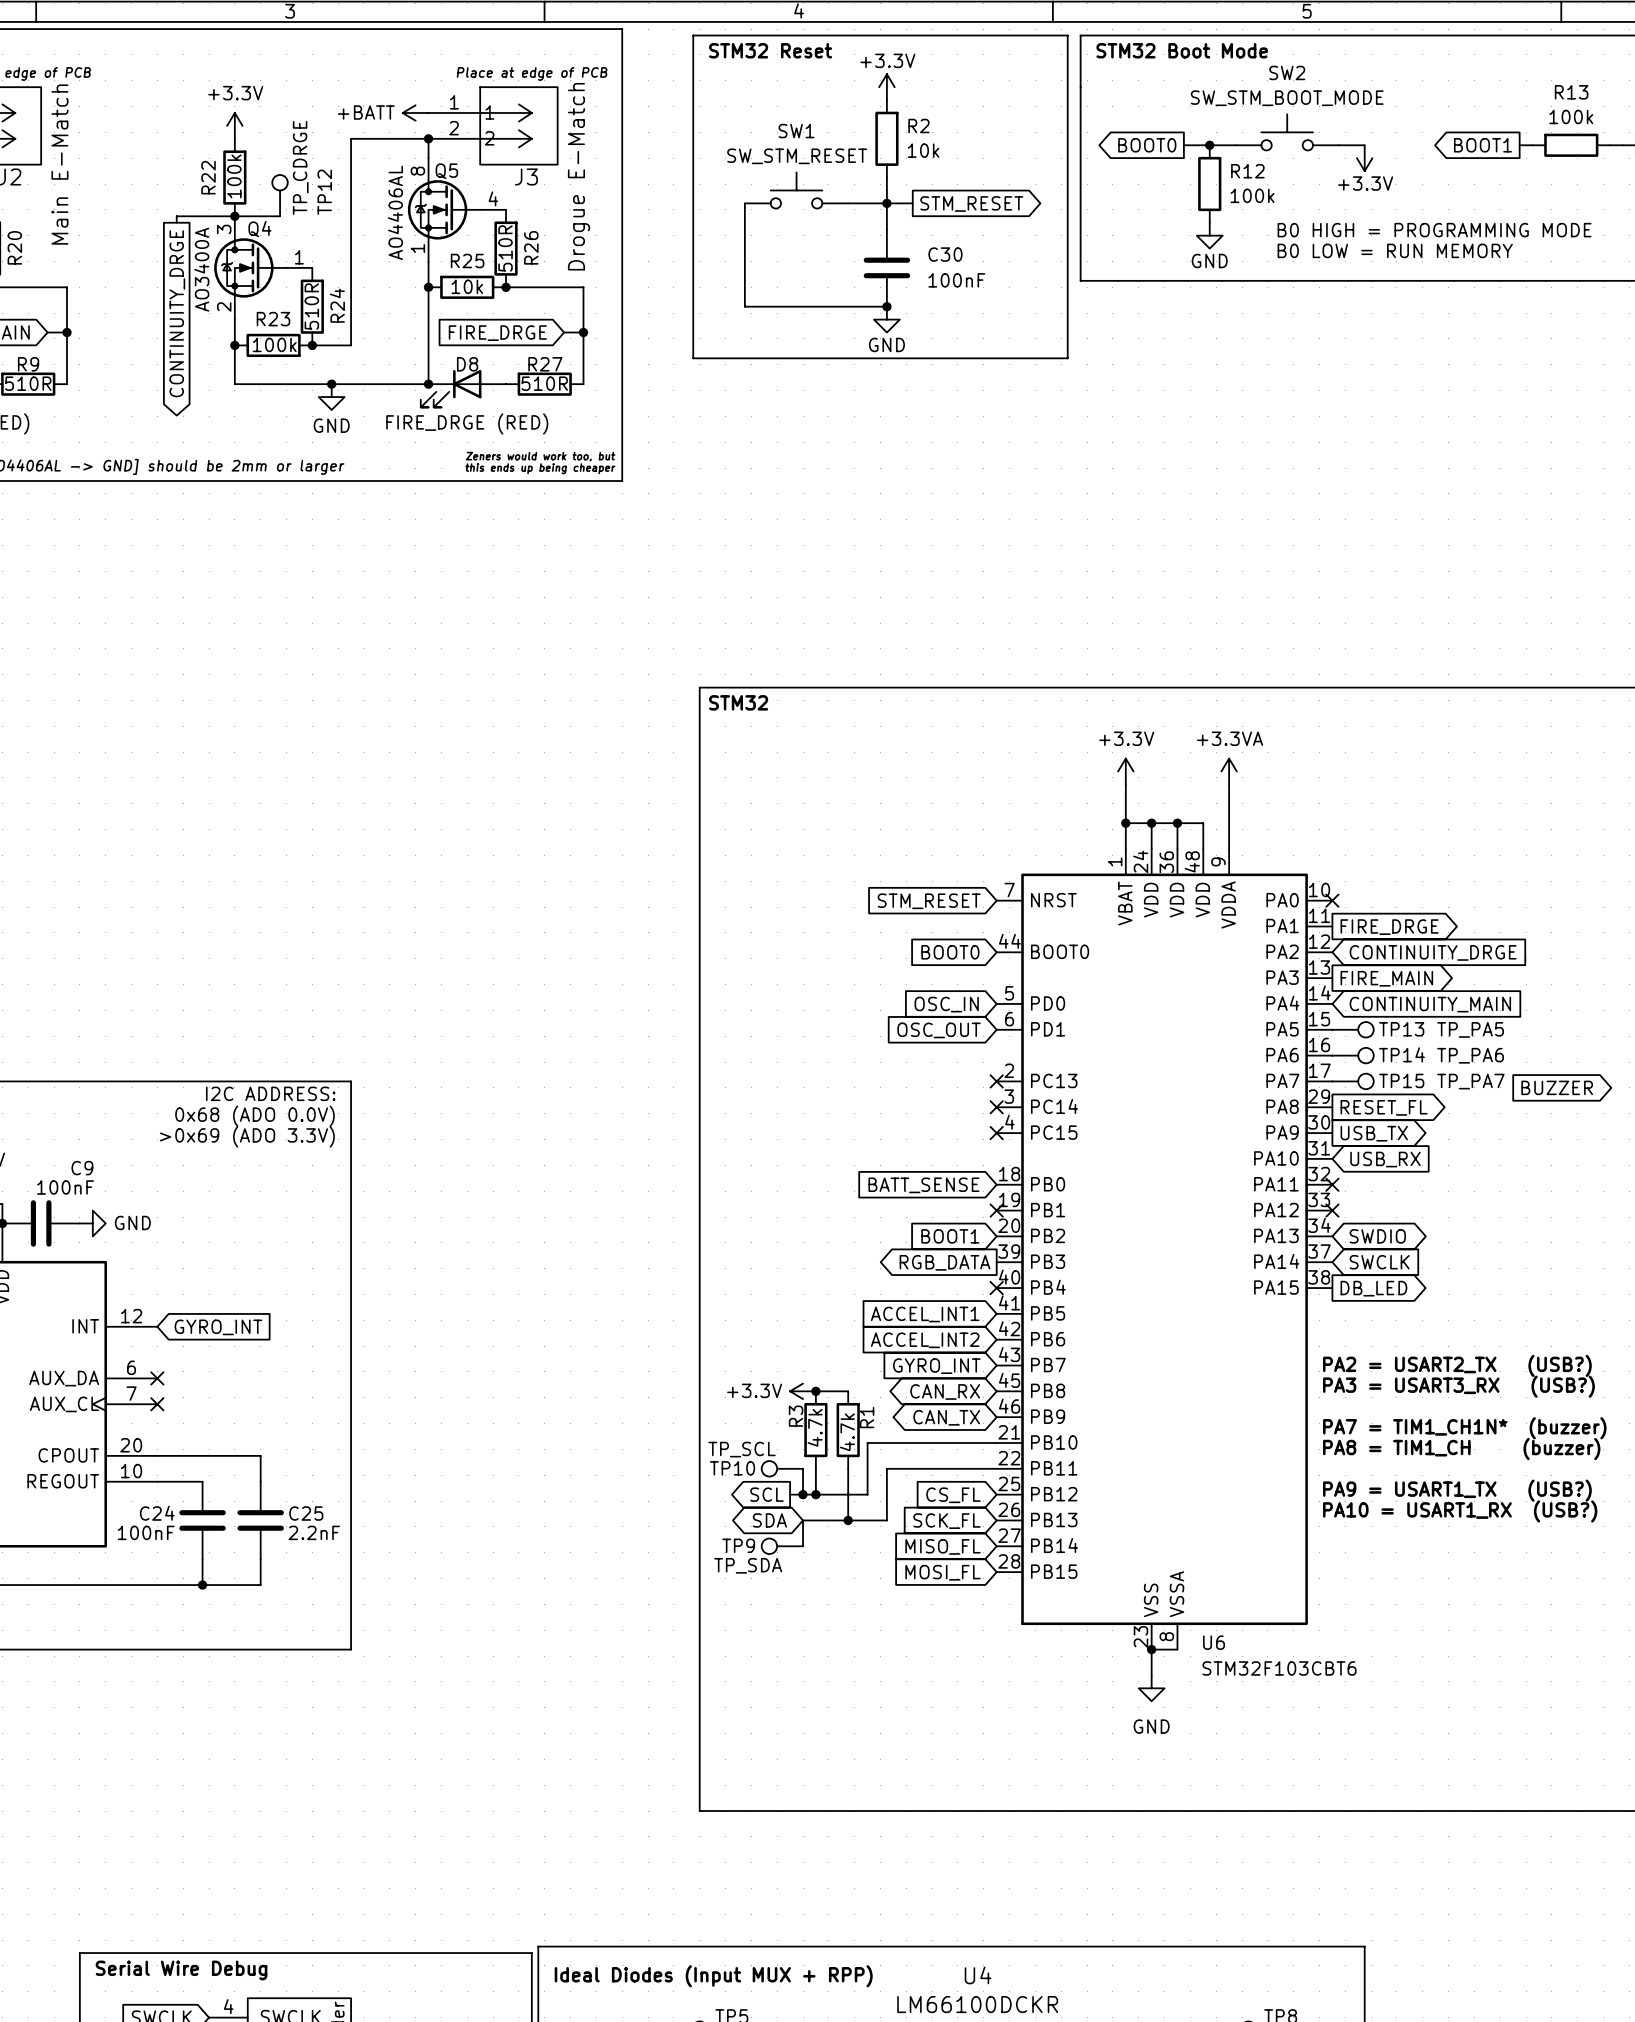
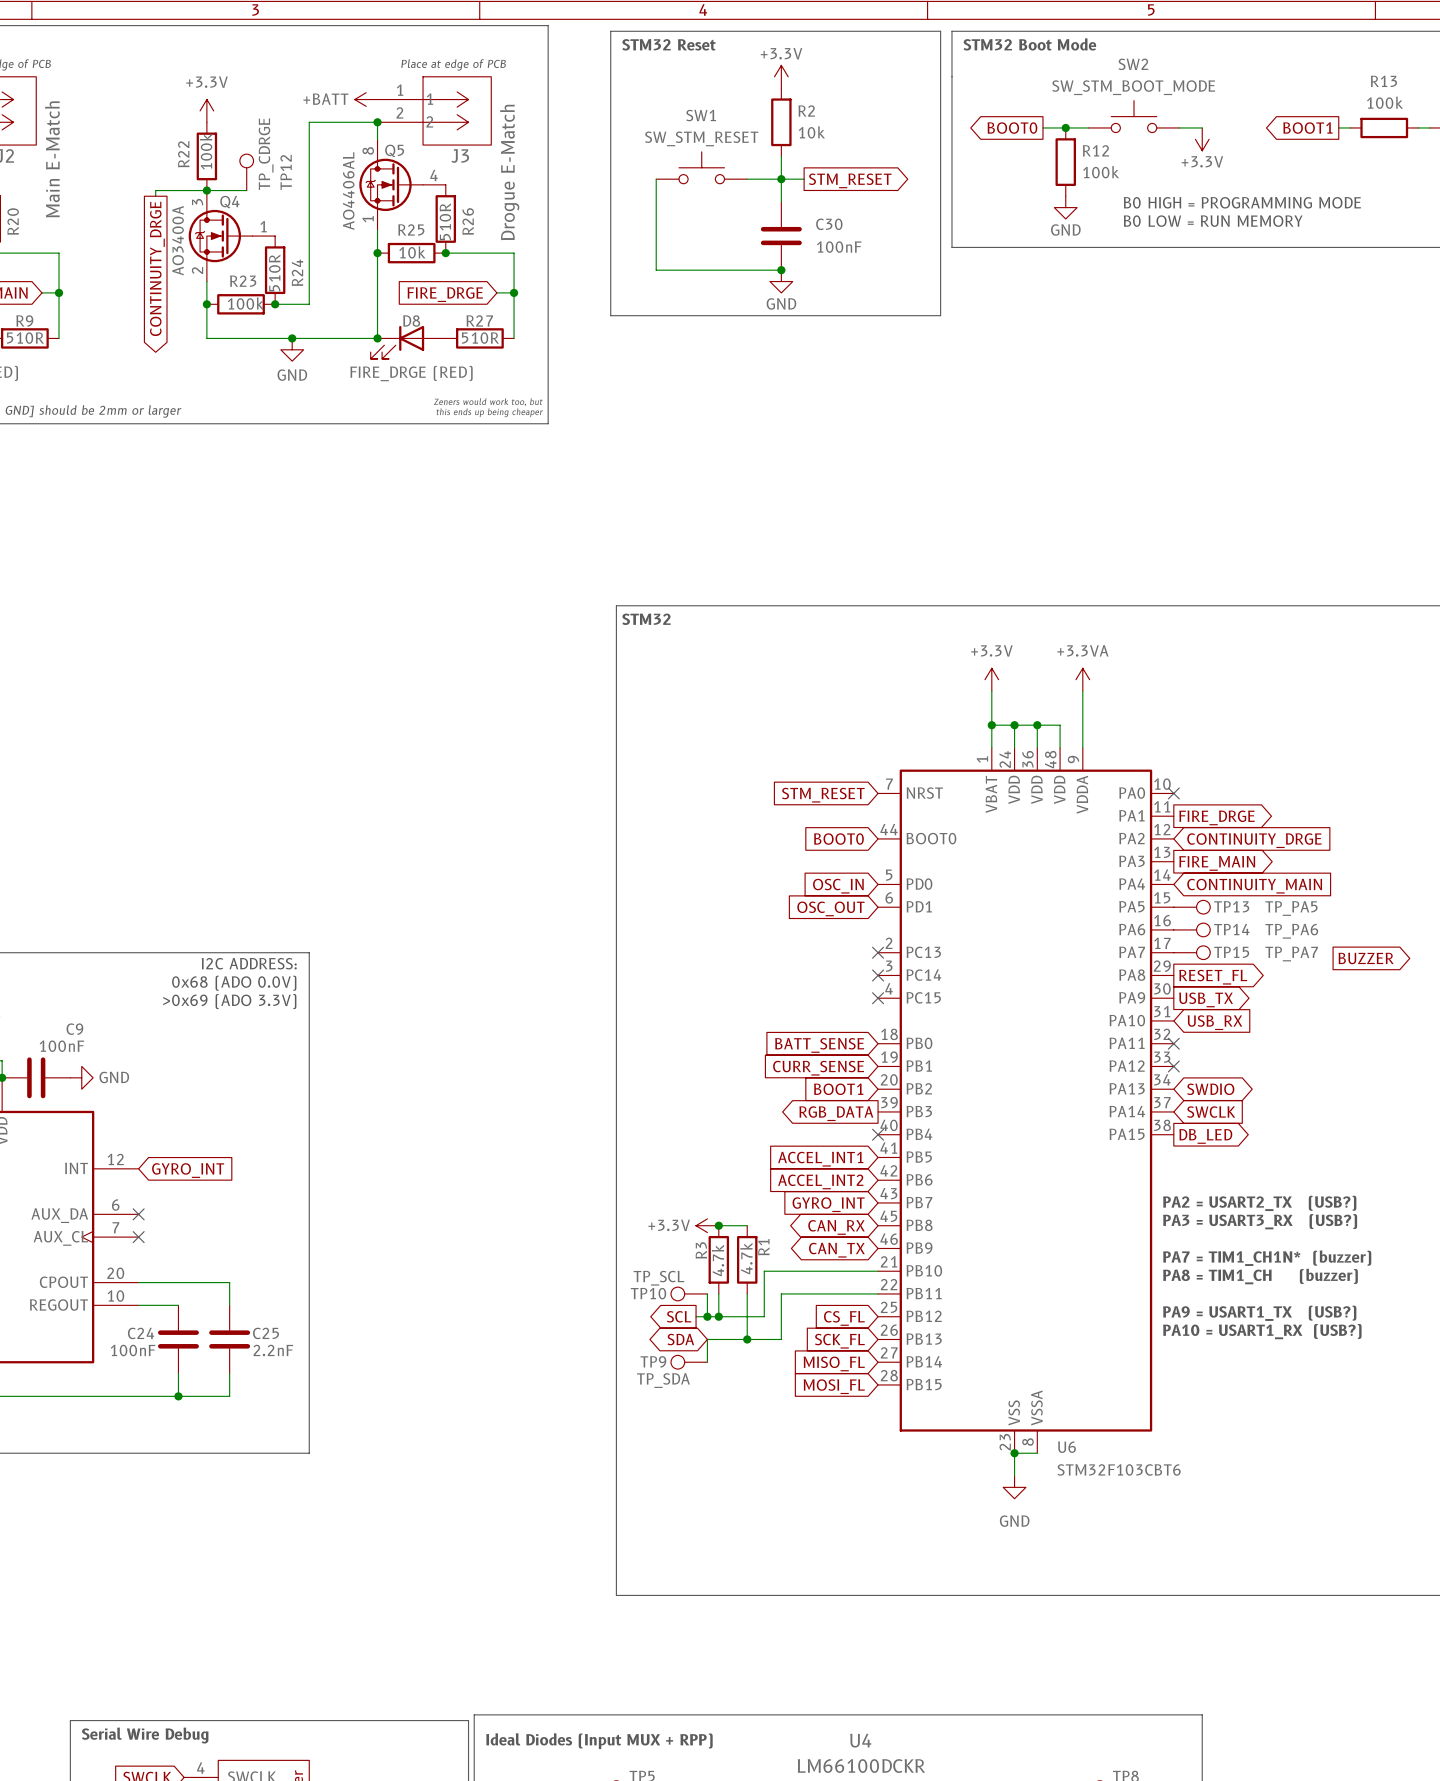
no-connect mark: (996, 1210) -> none
global label: none -> CURR_SENSE (818, 1068)

